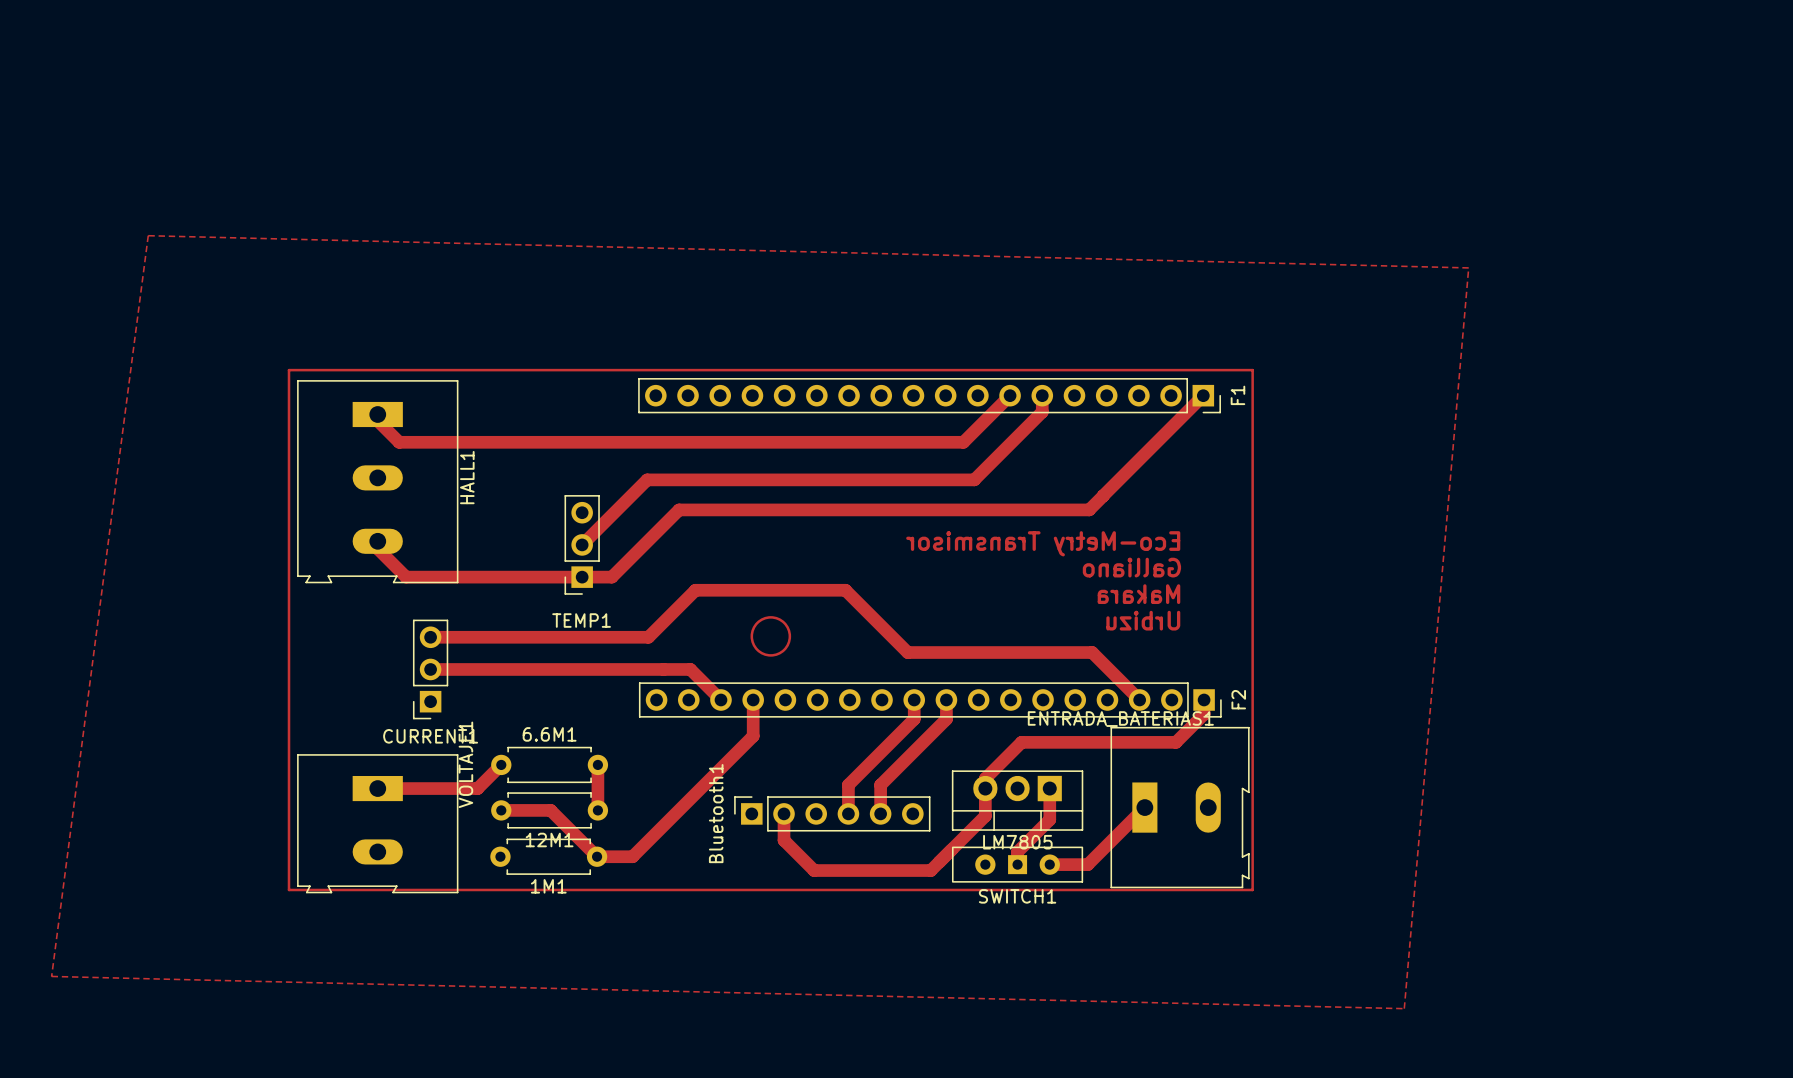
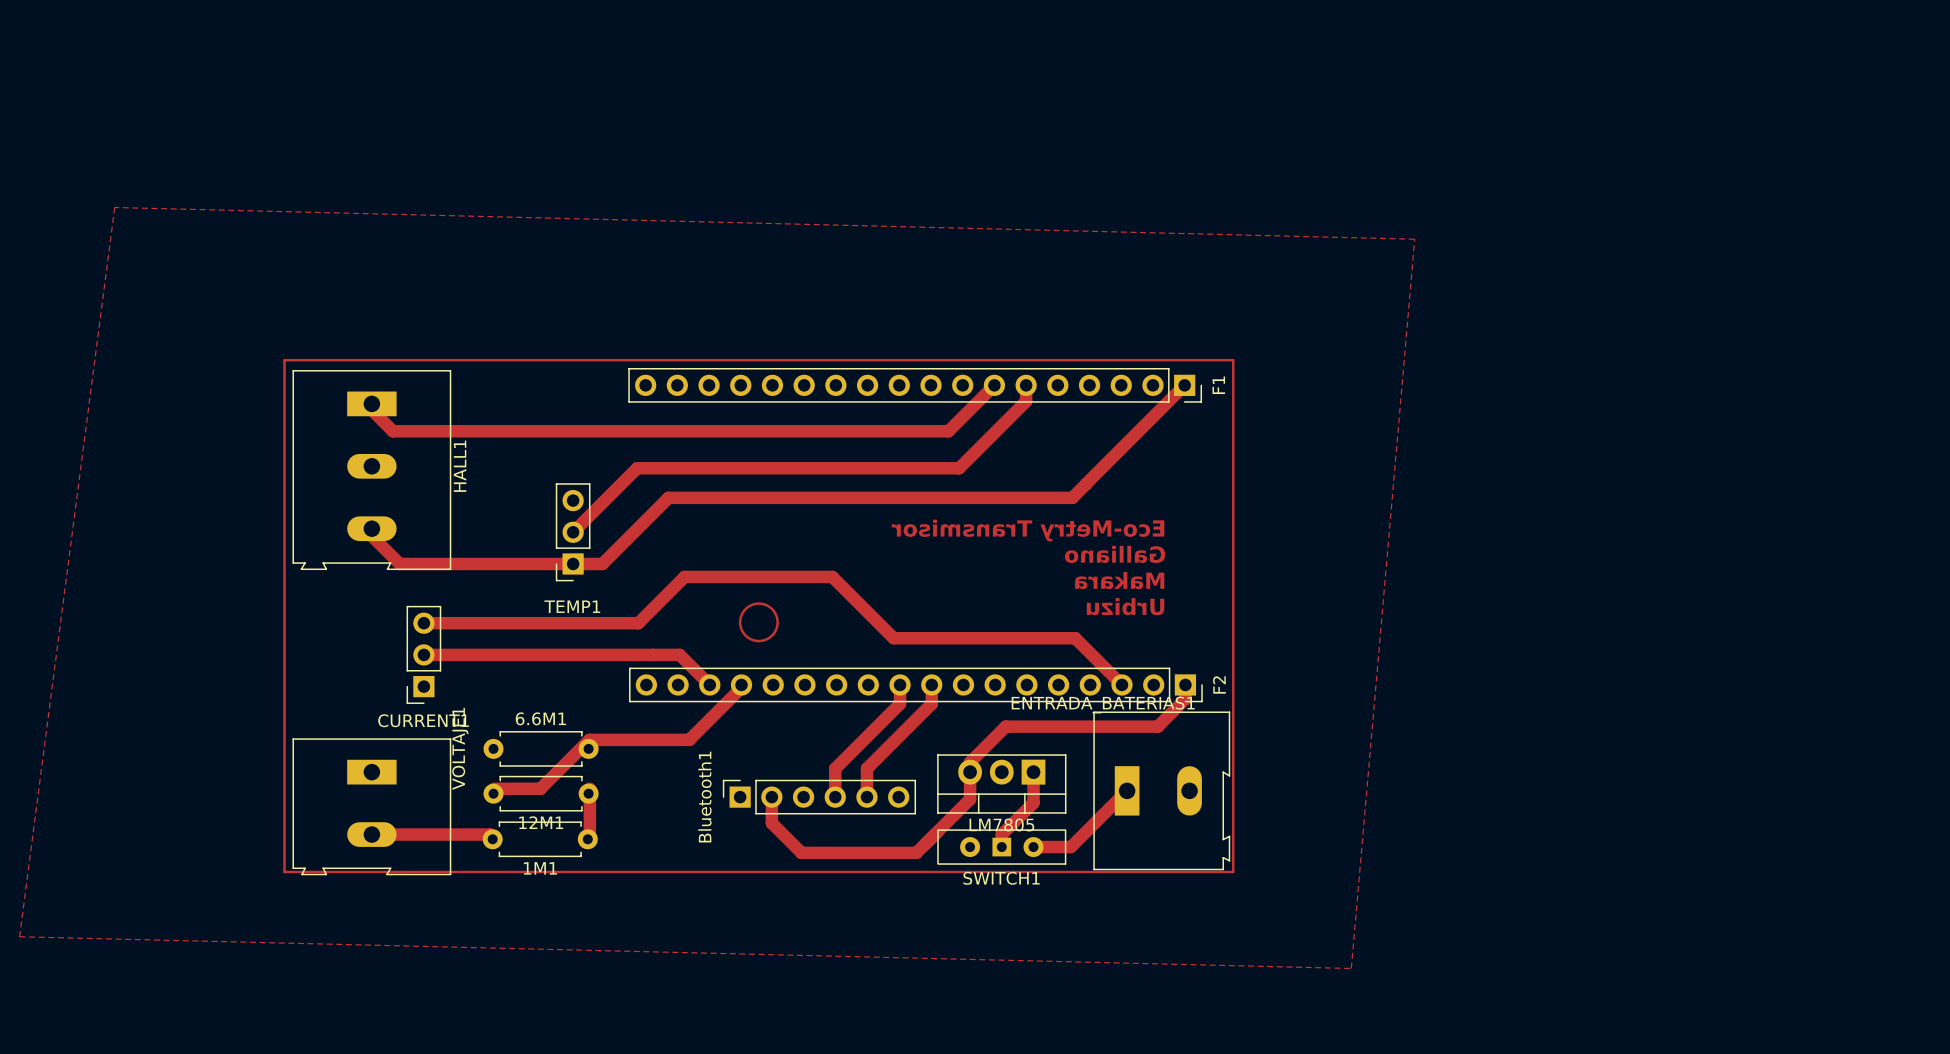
top zone outline: (148, 235) (51, 976) (1404, 1008) (1468, 267) (148, 235) -> (114, 207) (19, 936) (1351, 968) (1414, 239) (114, 207)
top track: (753, 702) (753, 736) (632, 856) (597, 856) (550, 810) (501, 810) -> (741, 687) (689, 739) (589, 739) (540, 788) (494, 788)
top track: (501, 764) (477, 788) (377, 788) -> none
top track: (597, 764) (597, 810) -> none
top track: none -> (589, 788) (589, 839)
top track: none -> (371, 834) (490, 834) (494, 839)

